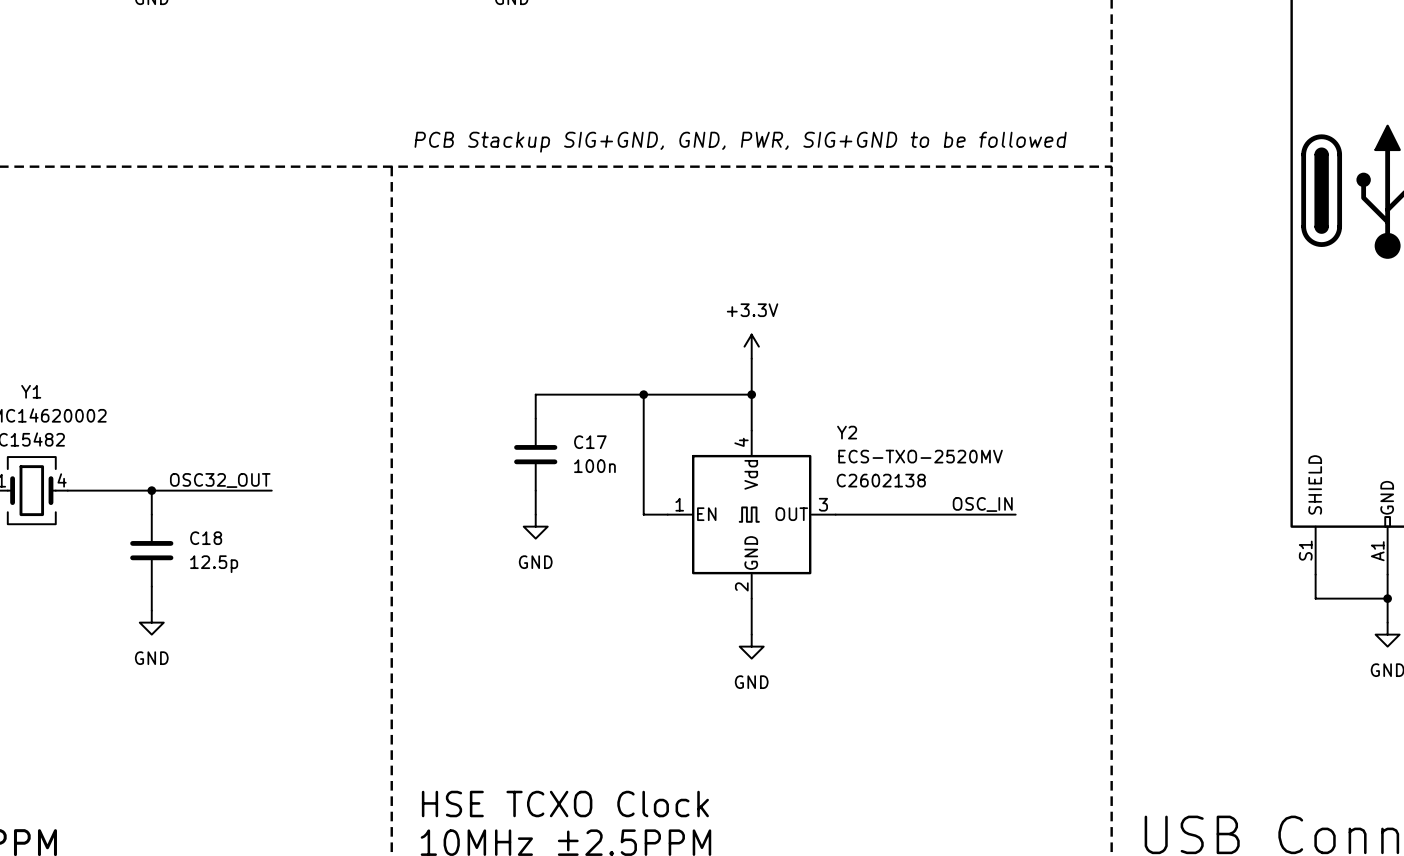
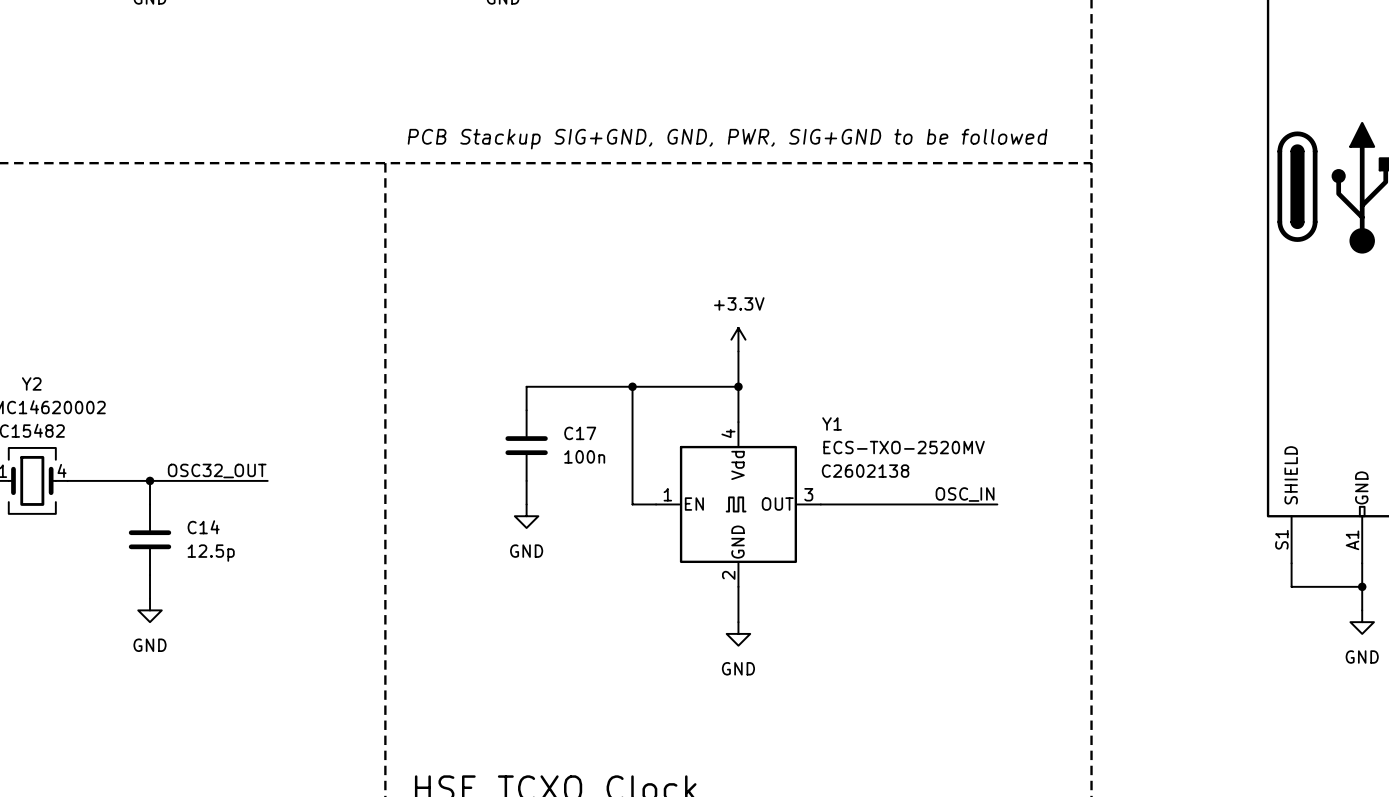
Y1 name: Y1 (31, 391) -> Y2 (31, 383)
Y2 name: Y2 (847, 432) -> Y1 (832, 423)
C18 name: C18 (206, 538) -> C14 (203, 527)

